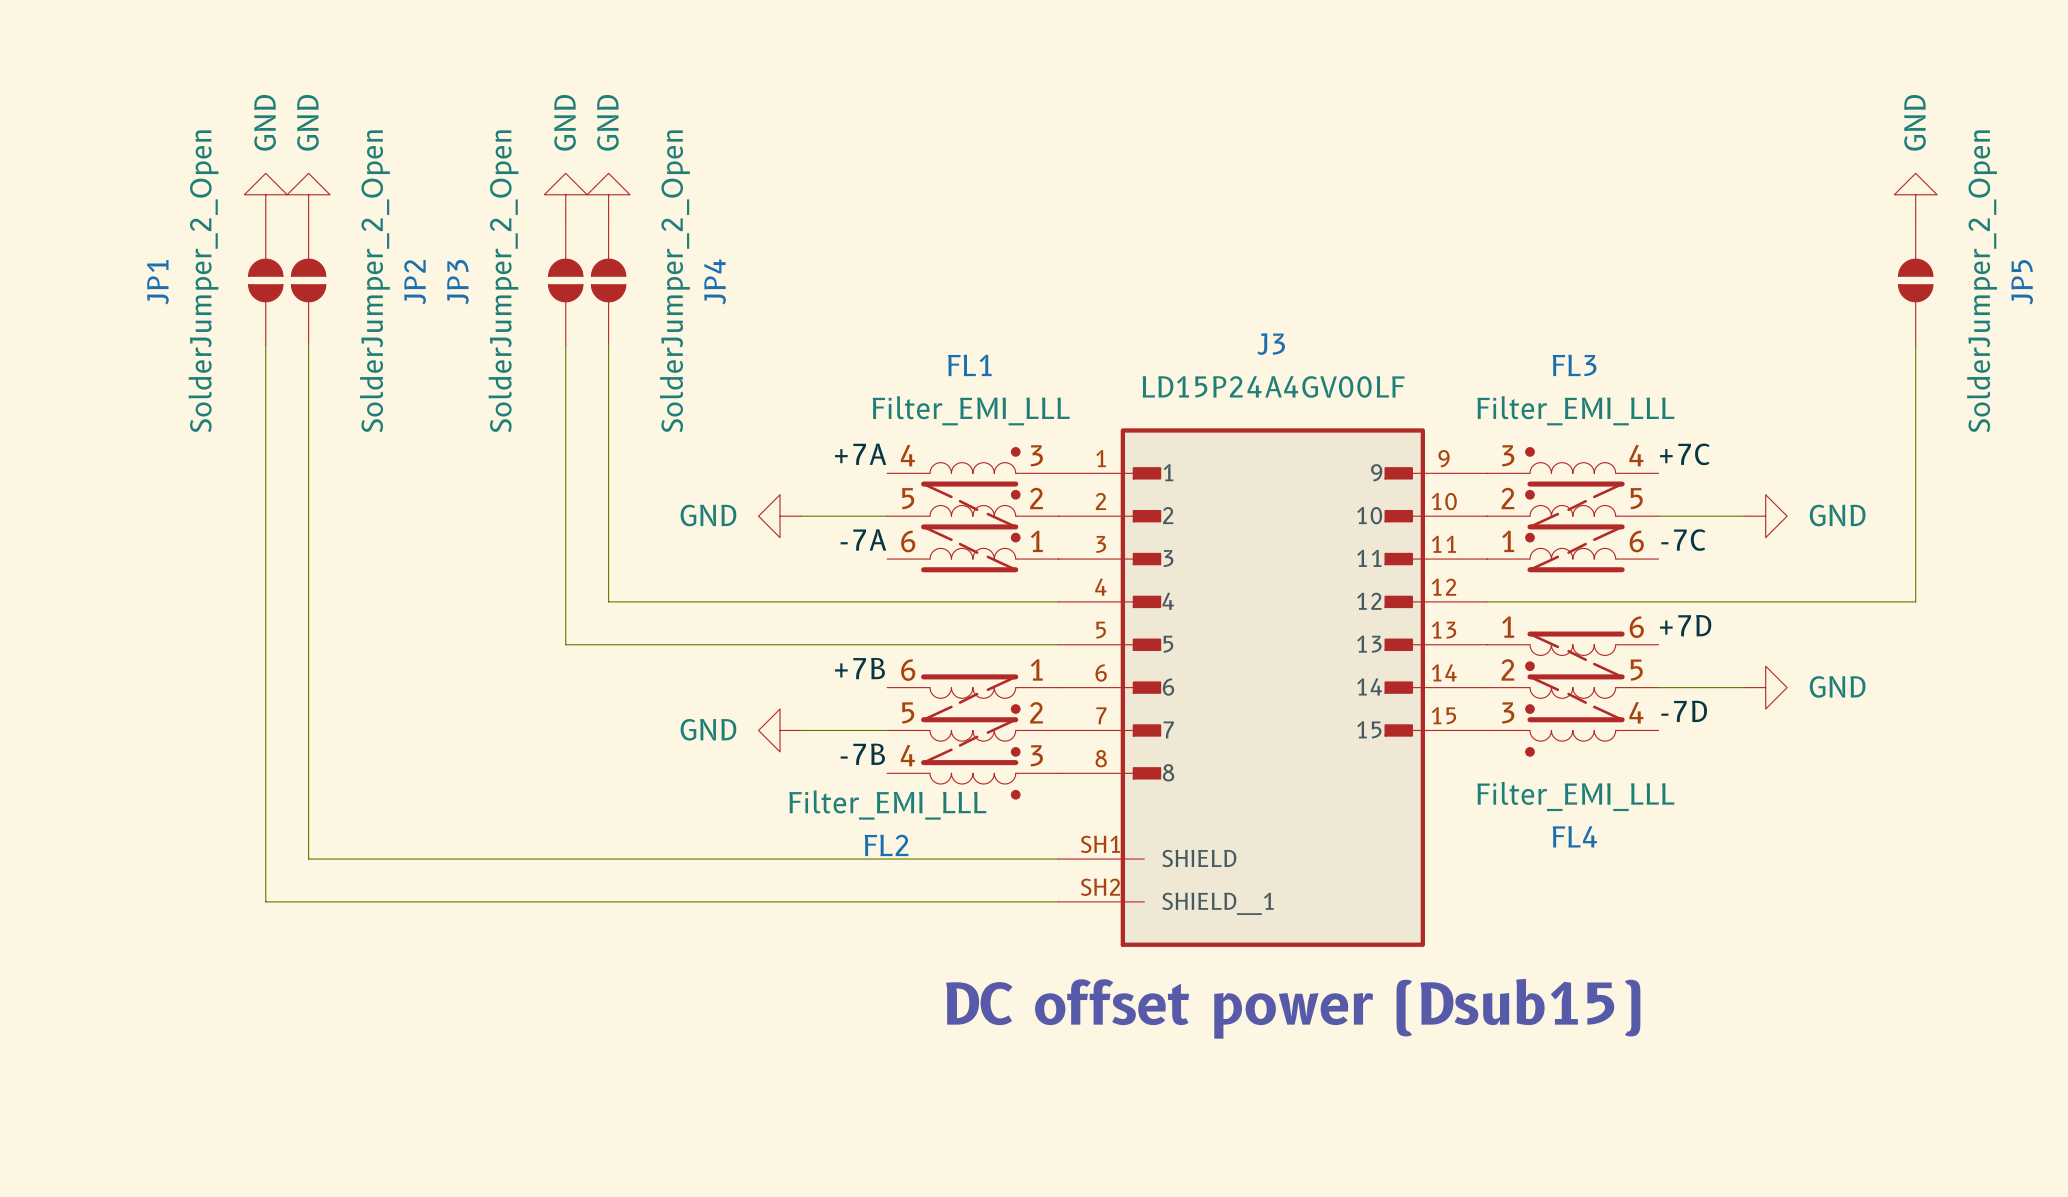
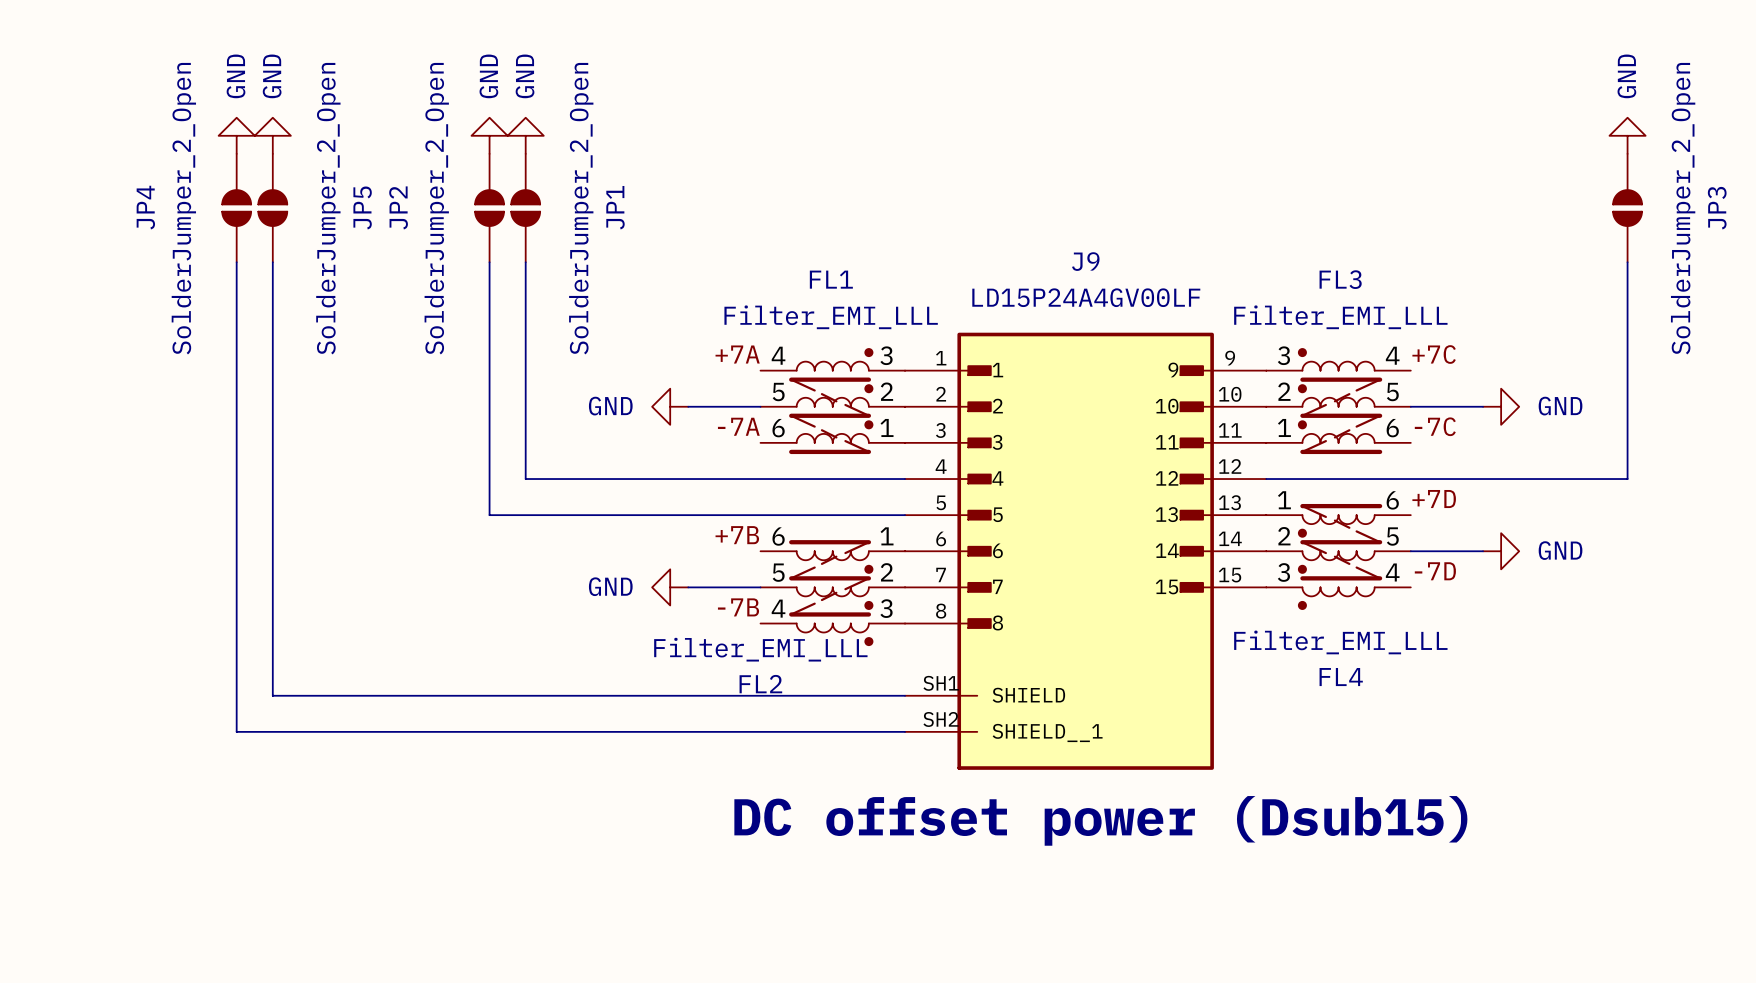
JP4 name: JP4 (715, 281) -> JP1 (615, 207)
JP1 name: JP1 (157, 282) -> JP4 (145, 207)
JP2 name: JP2 (415, 282) -> JP5 (362, 207)
JP3 name: JP3 (457, 282) -> JP2 (398, 207)
JP5 name: JP5 (2022, 282) -> JP3 (1717, 208)
J3 name: J3 (1271, 344) -> J9 (1085, 261)

